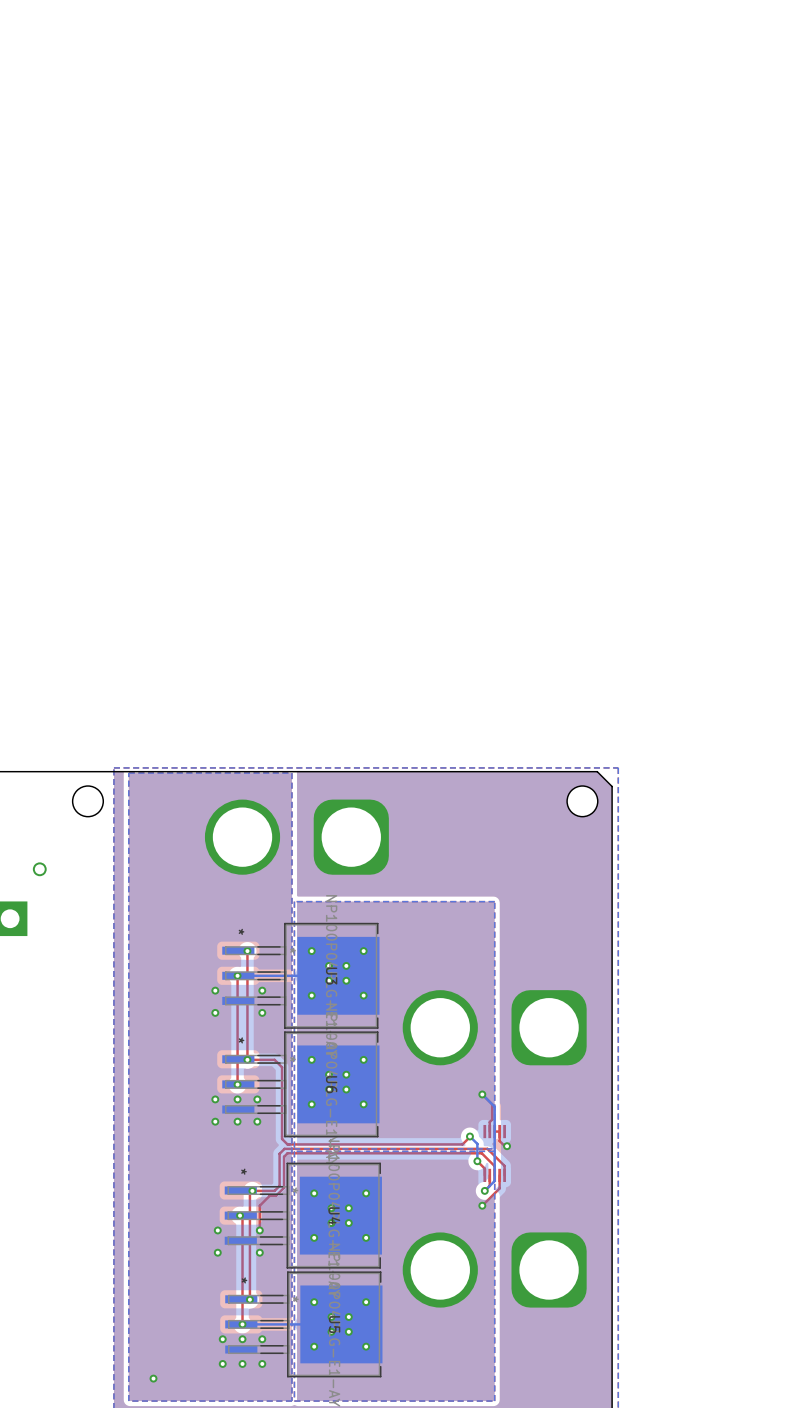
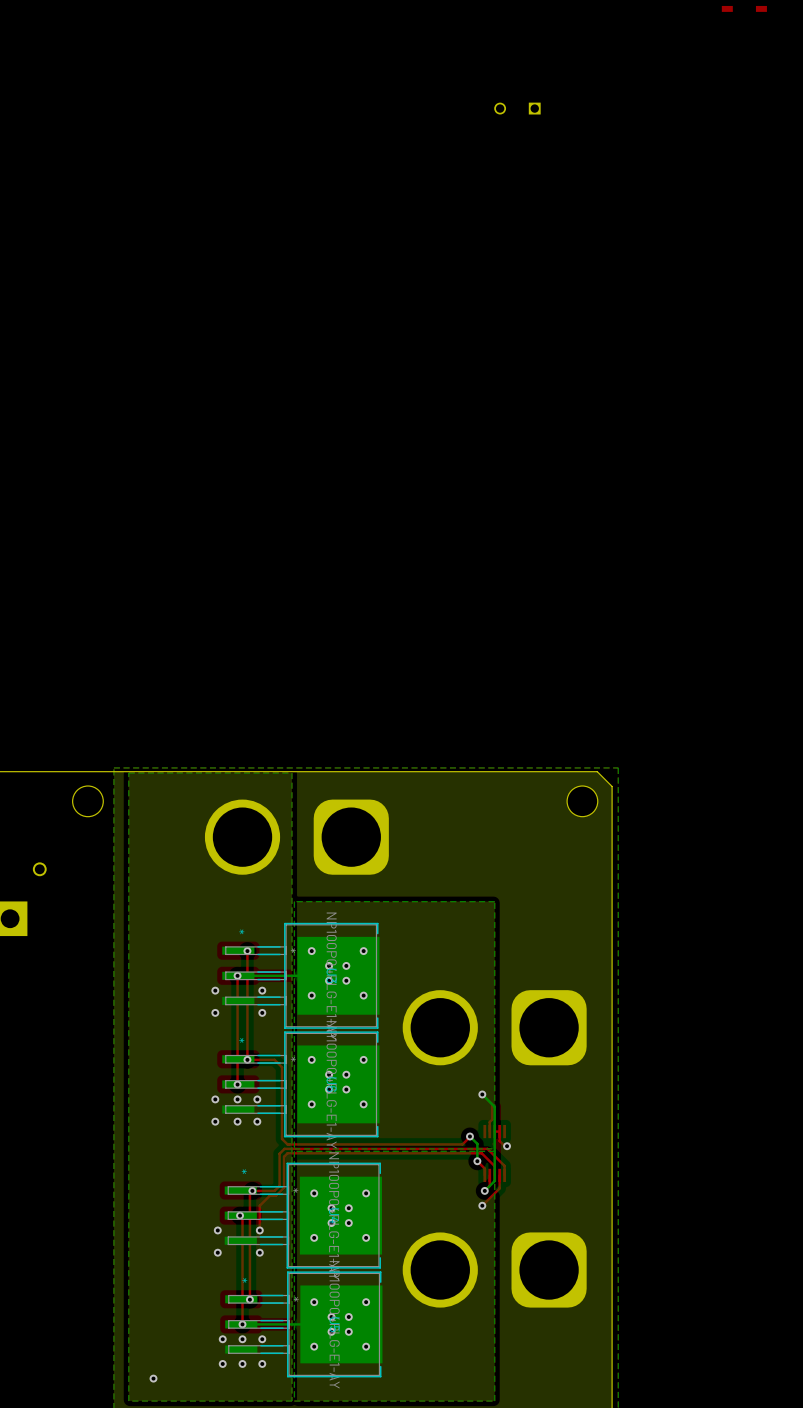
part: none -> (744, 8)
part: none -> (517, 108)

